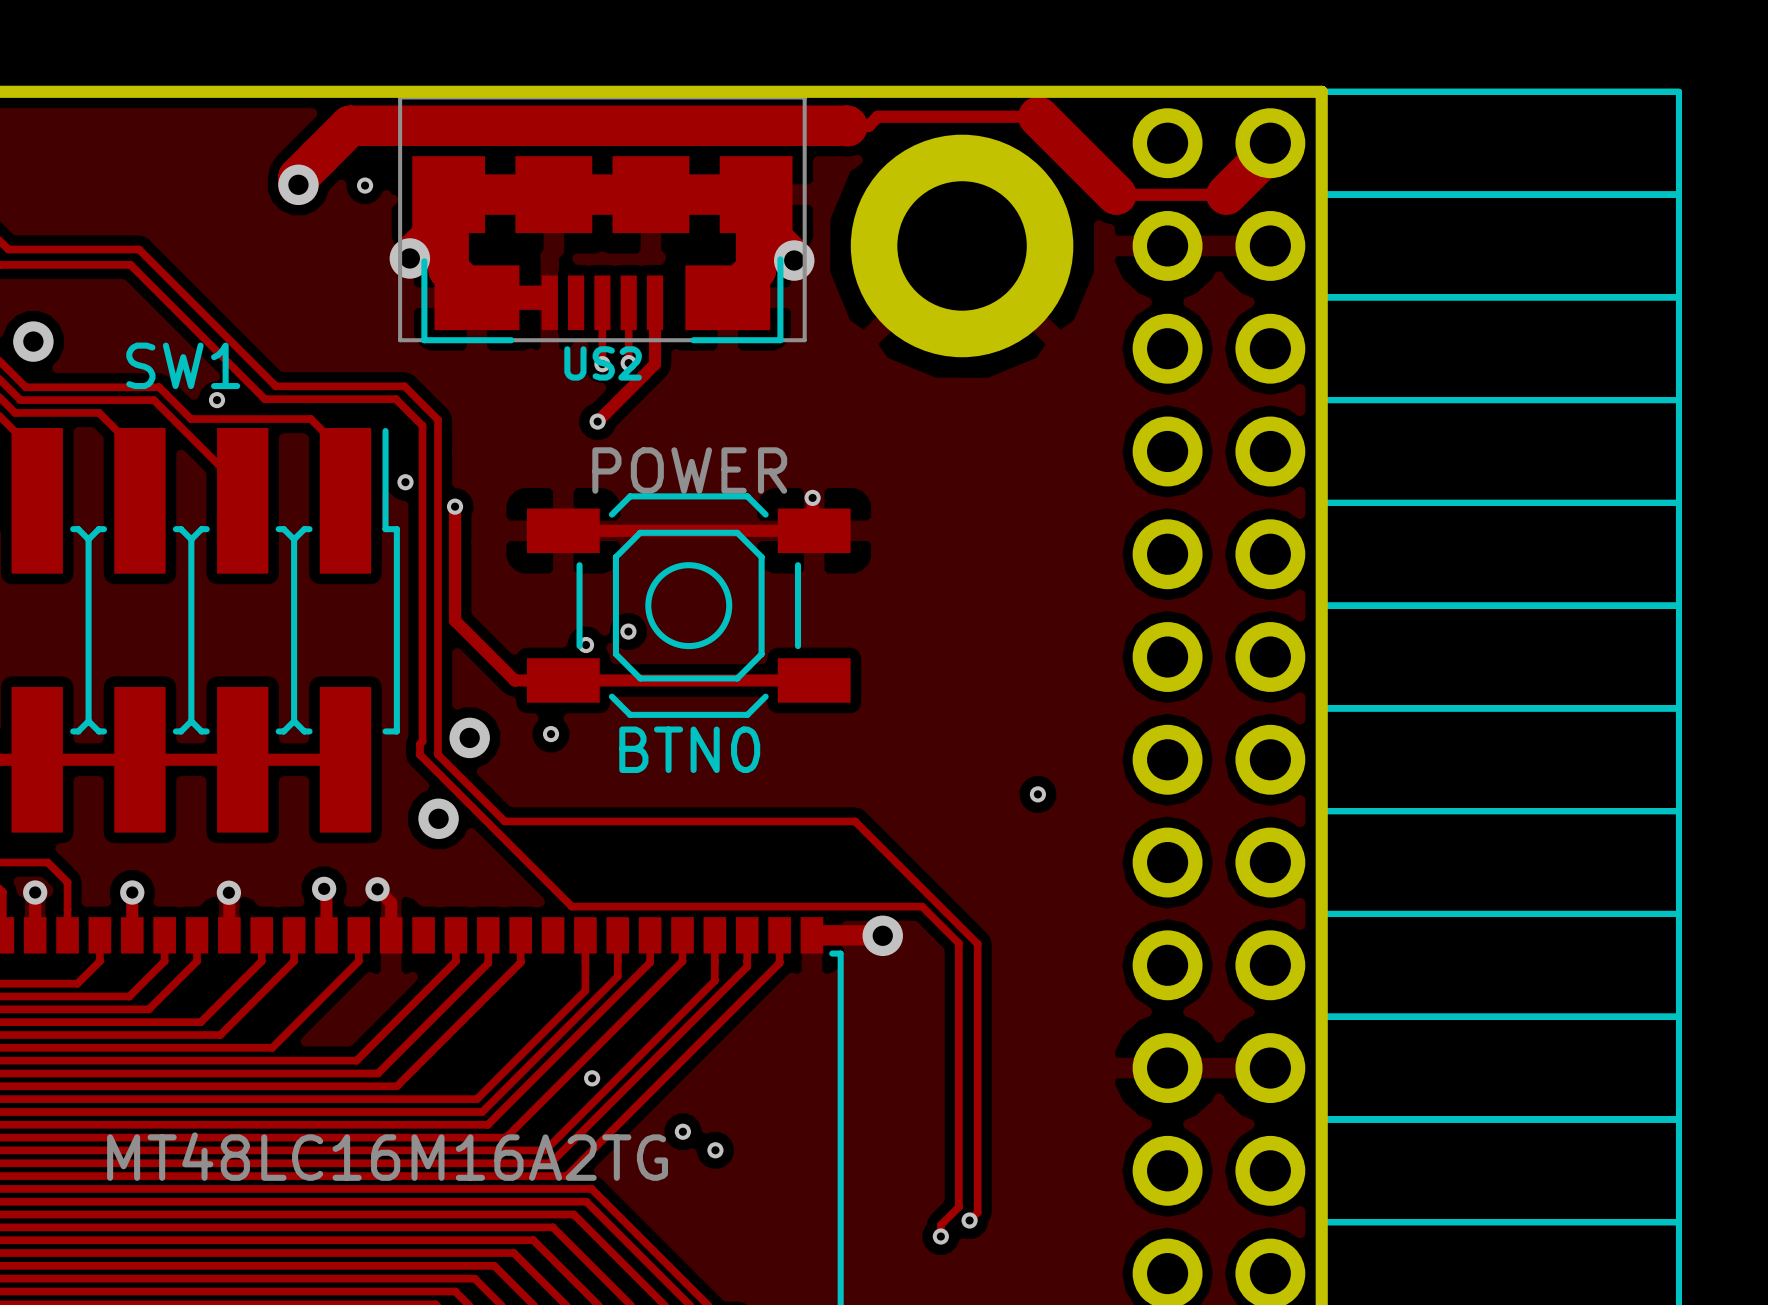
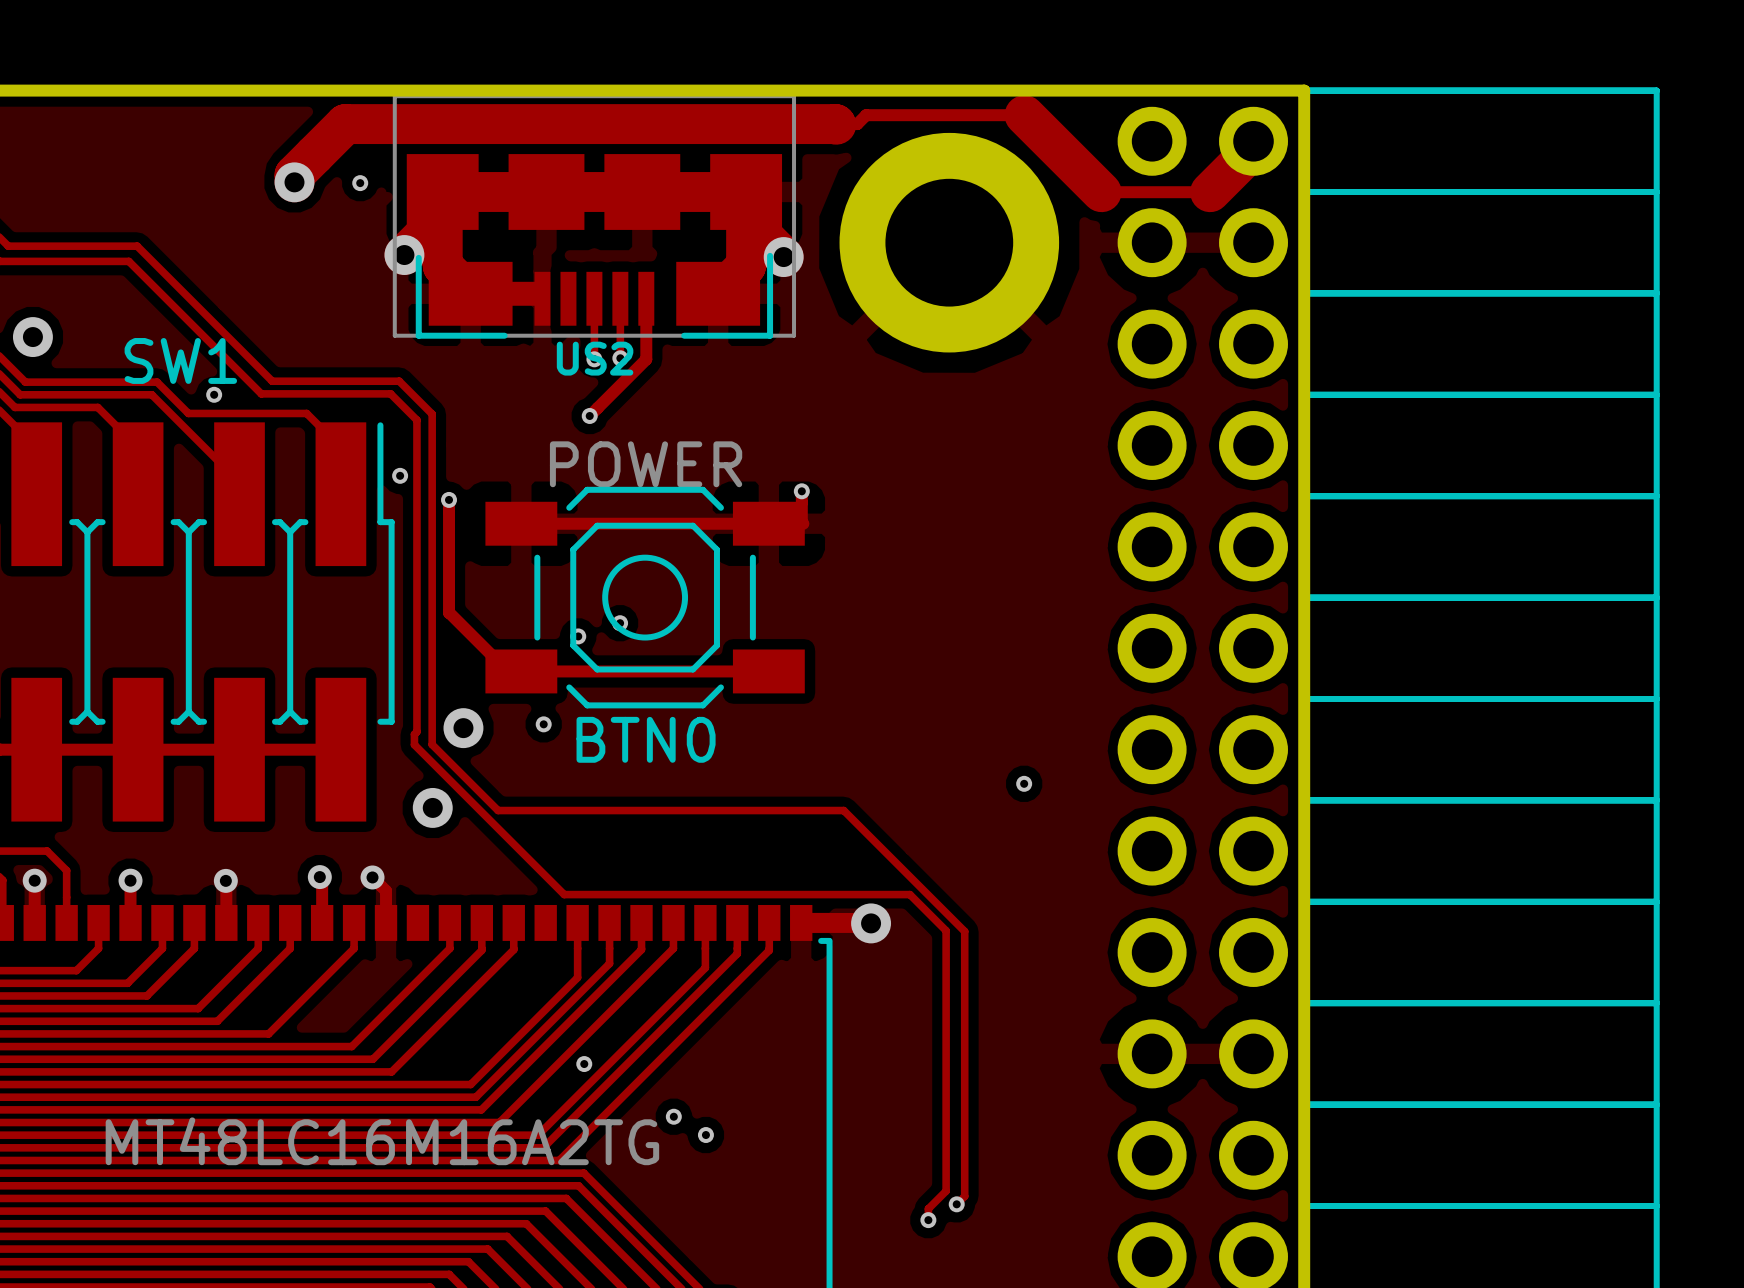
BTN0 position: (688, 605) -> (645, 597)

